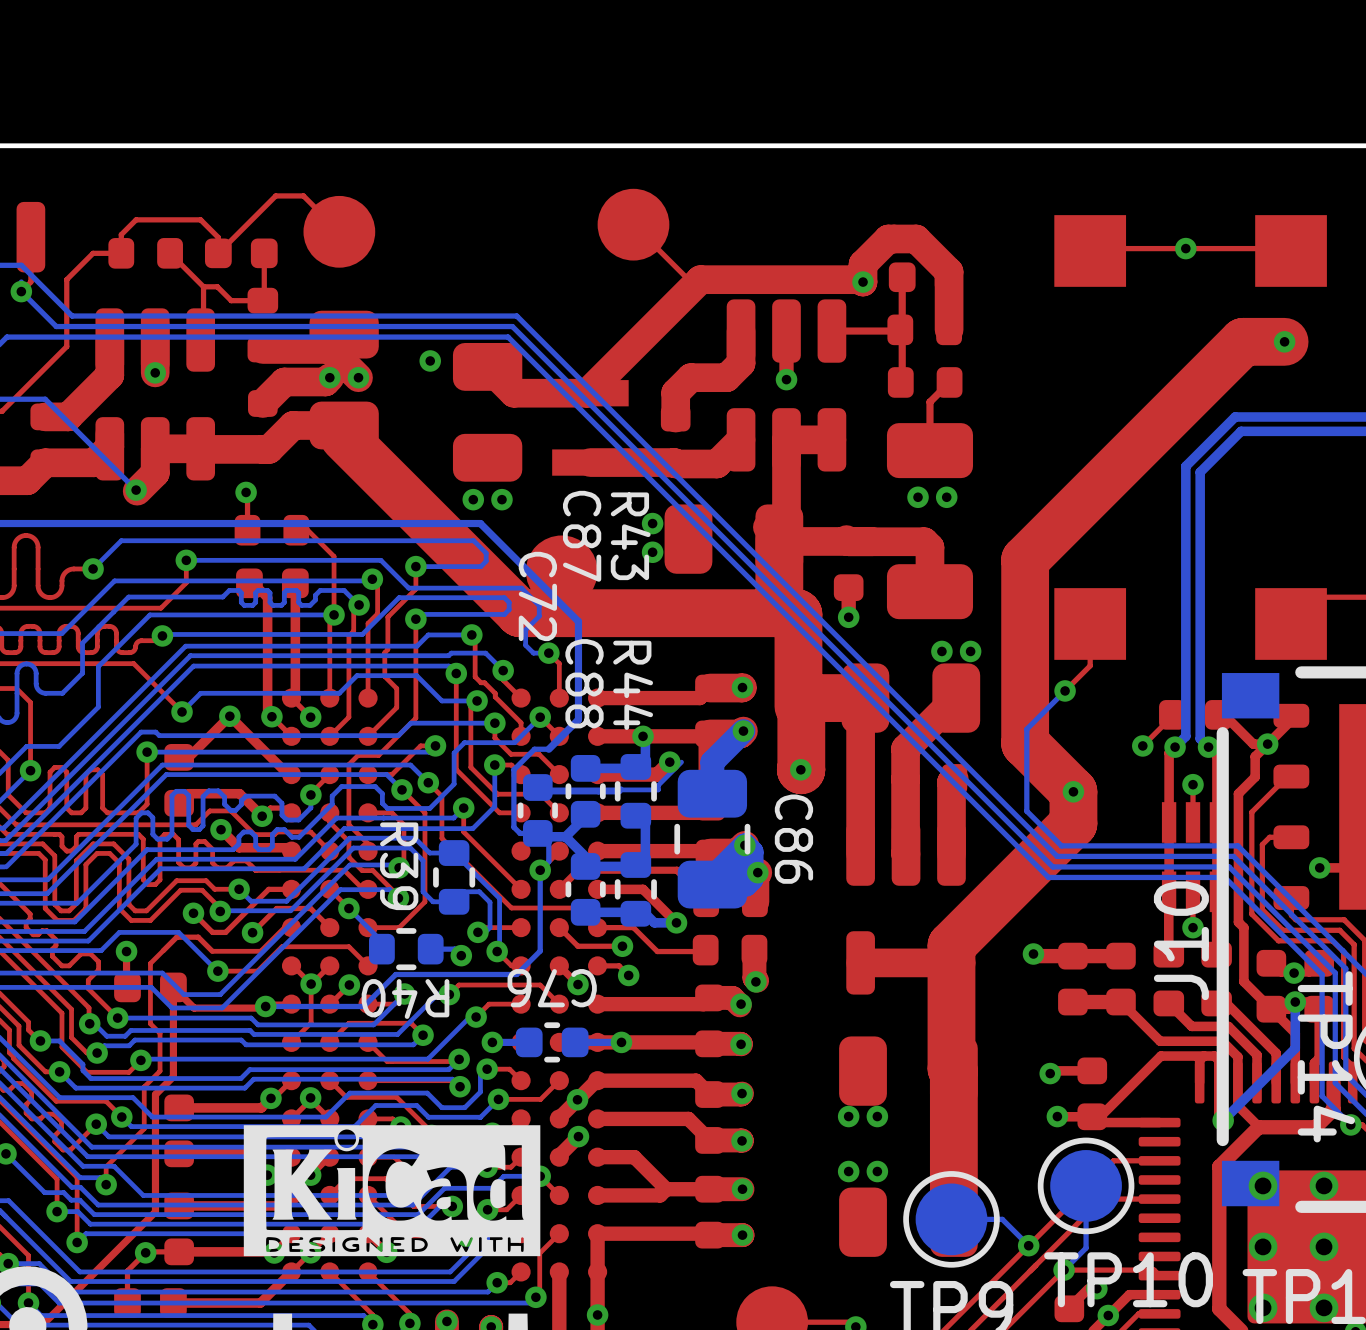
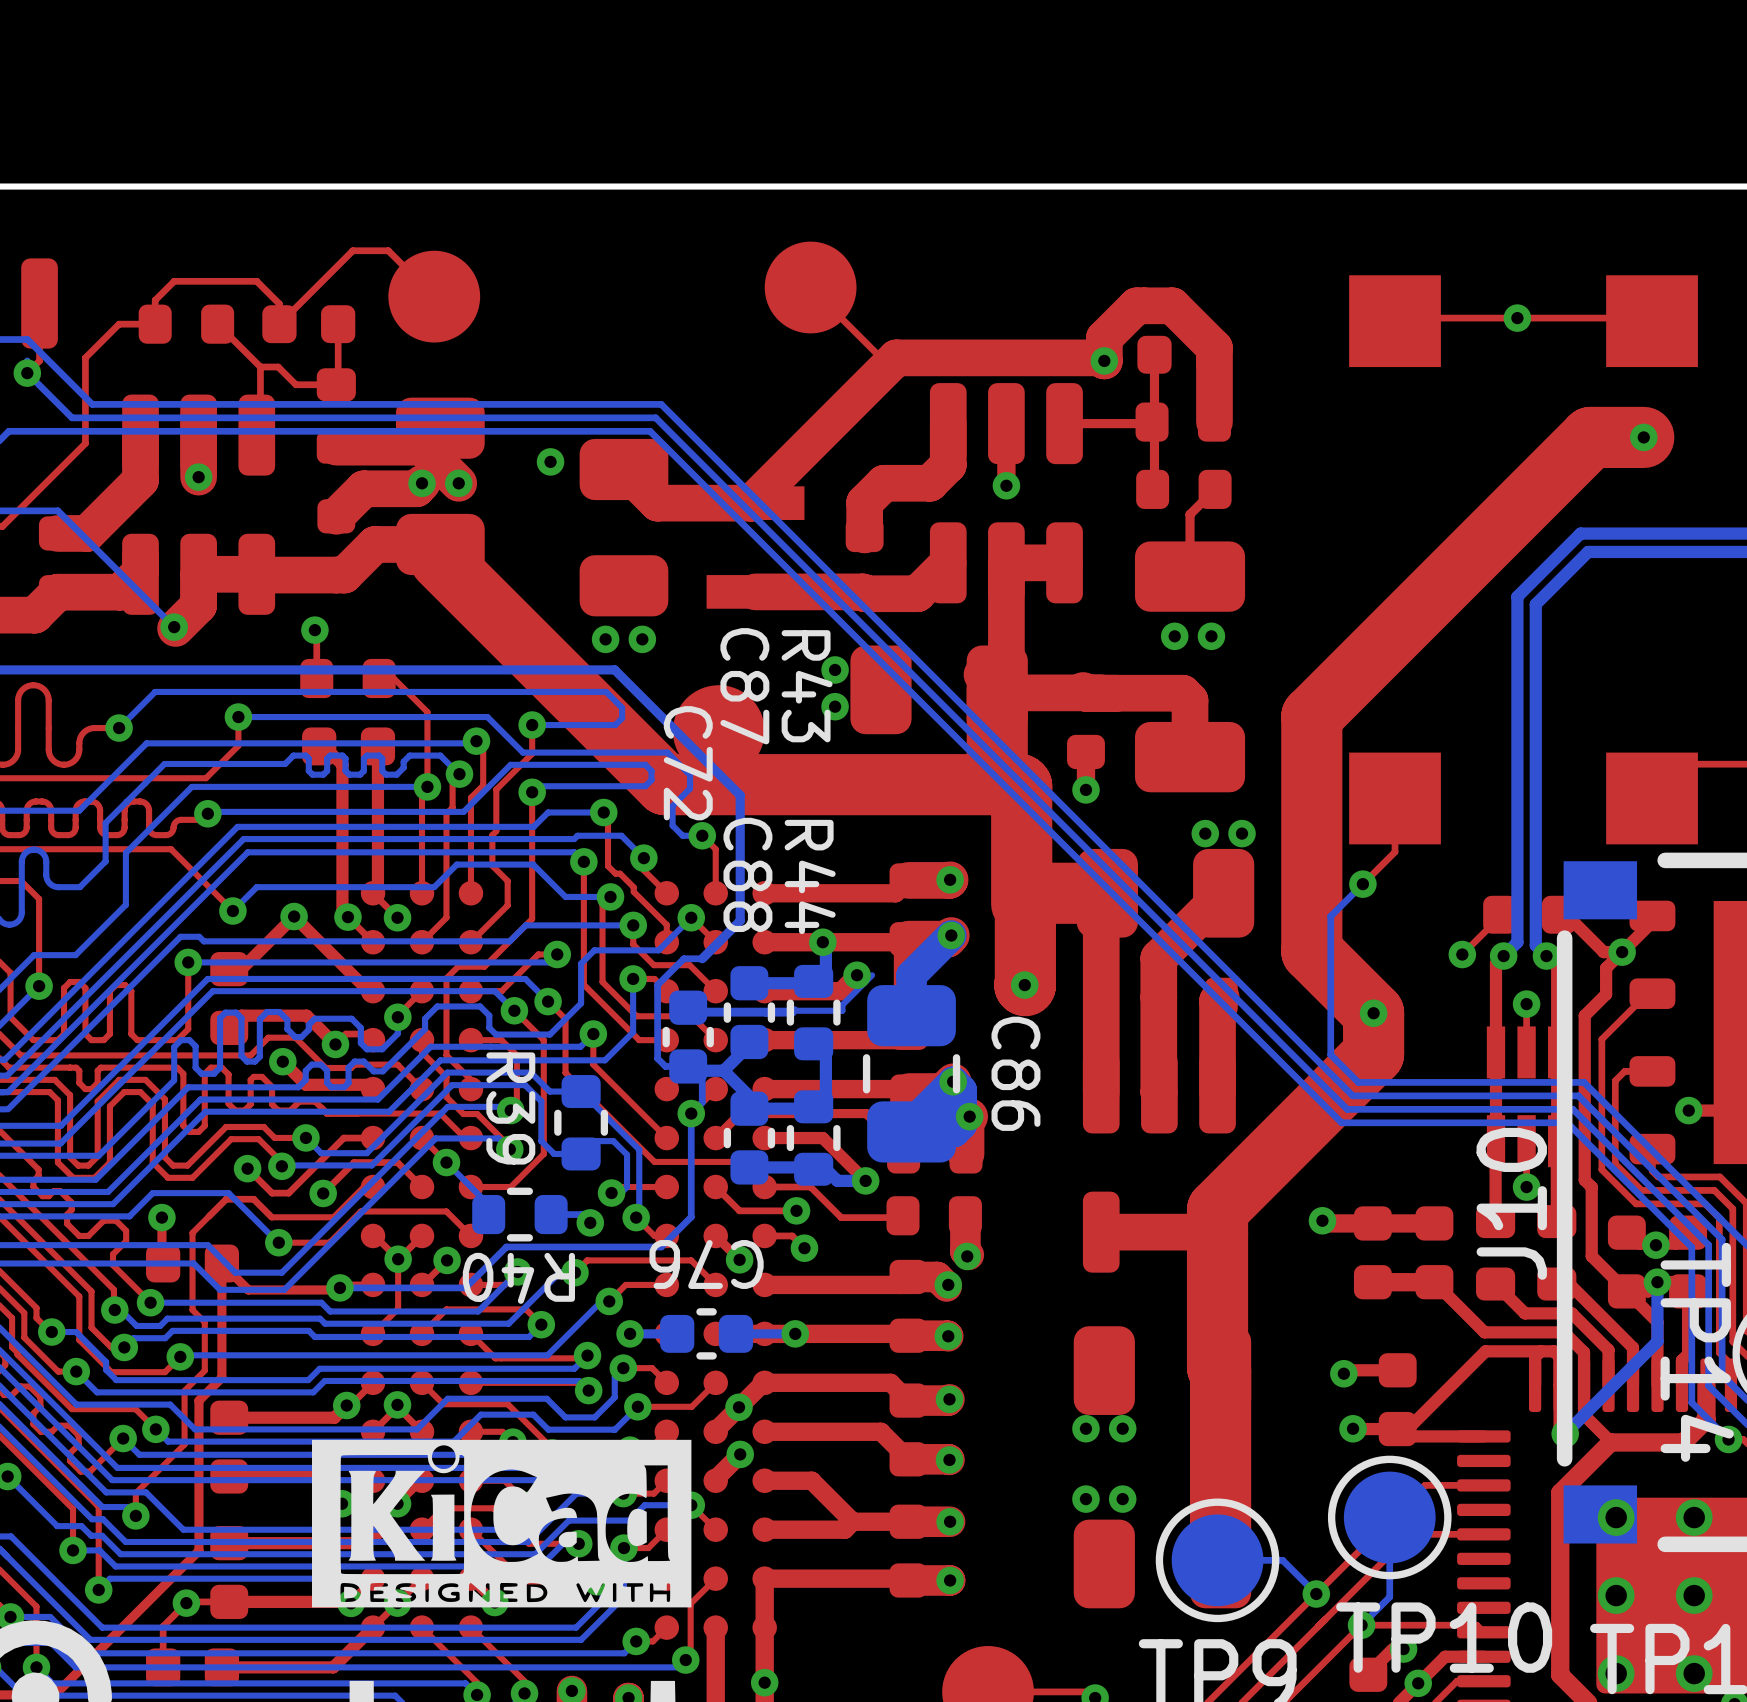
bottom track: (1039, 716) (1026, 729) (1026, 811) (1039, 824) -> (1330, 916) (1330, 1054)

